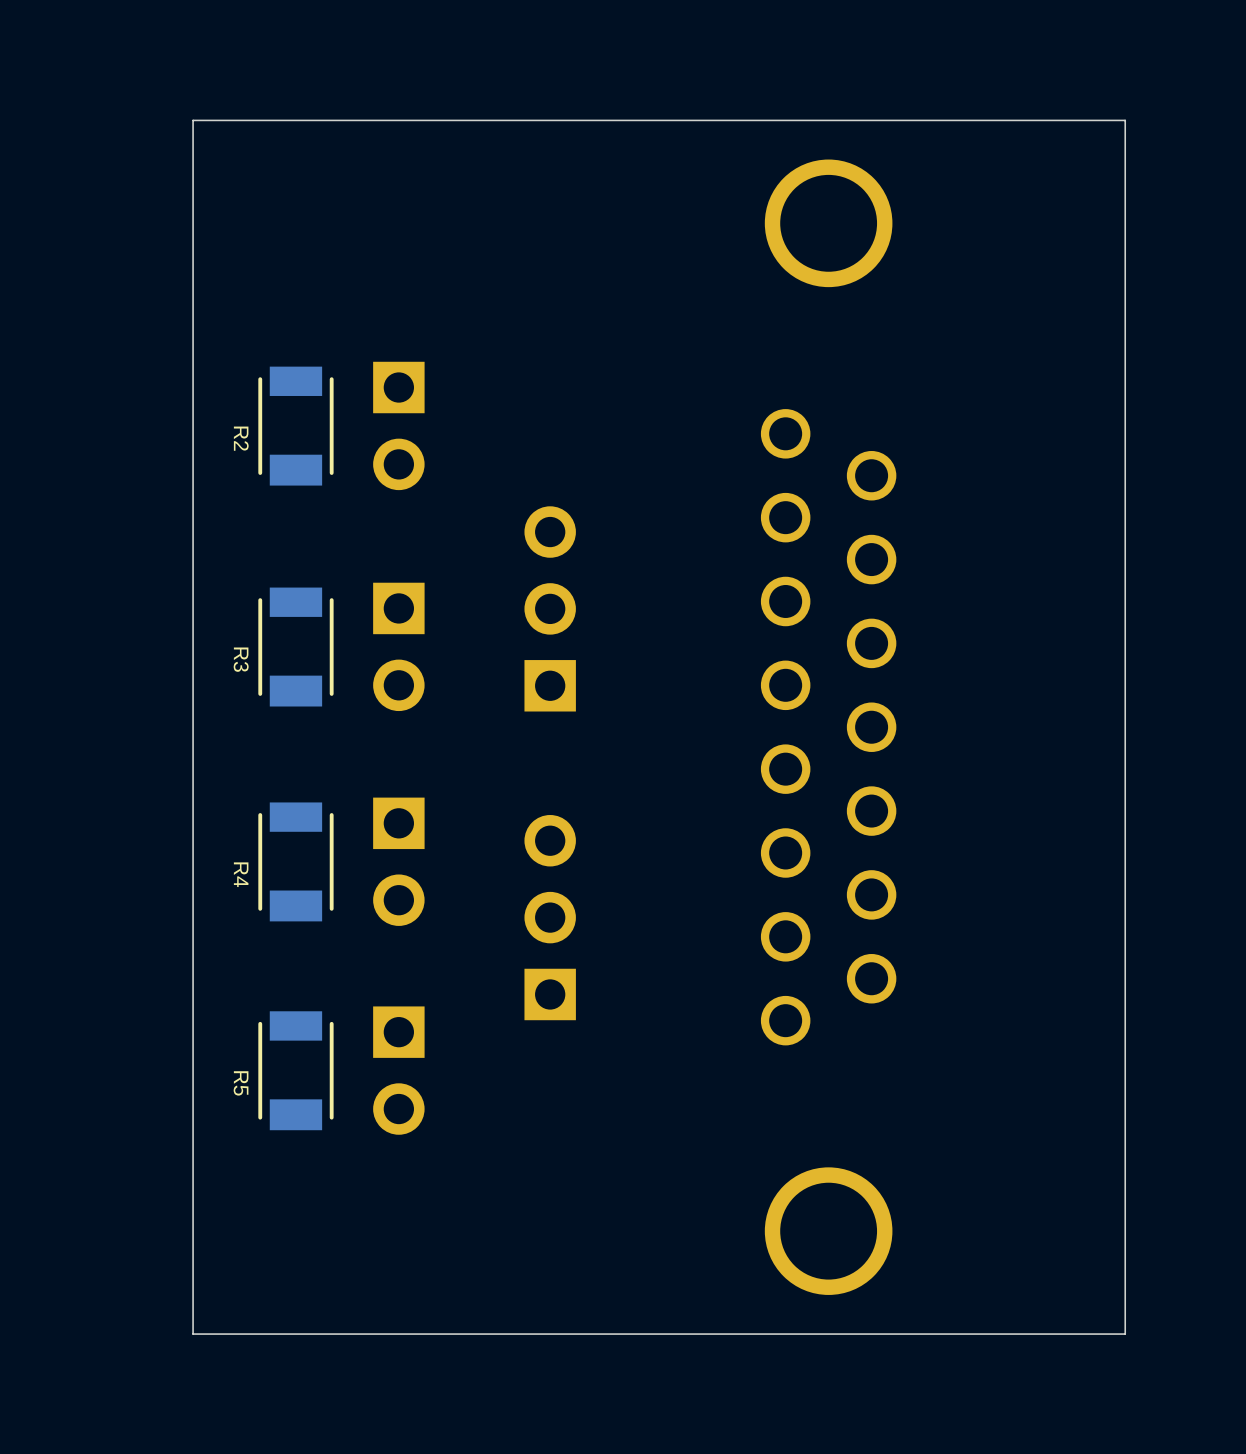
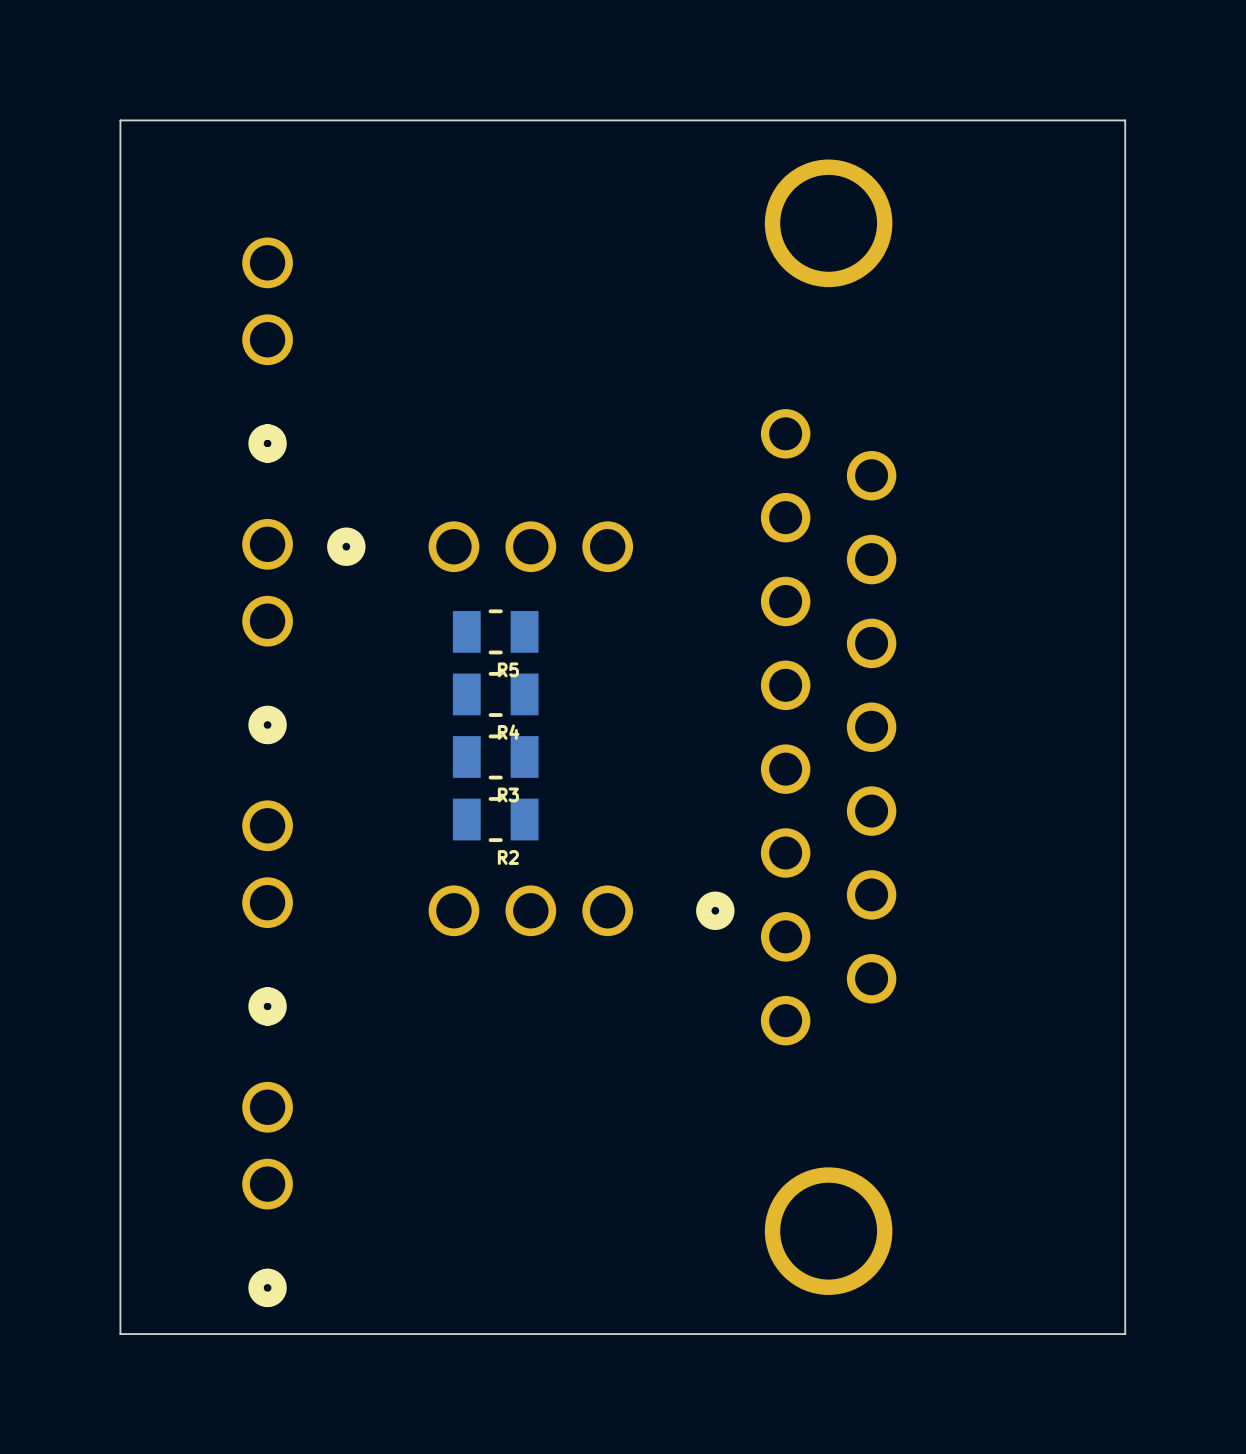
board edge: (193, 120) (193, 1334) -> (193, 120) (120, 120) (120, 1334) (193, 1334)
part: none -> (267, 350)
R2 footprint: [258, 366, 334, 486] -> [452, 797, 539, 843]
part: (398, 425) -> none
R2 name position: R2 (241, 438) -> R2 (508, 857)
part: none -> (480, 546)
R3 footprint: [258, 587, 334, 707] -> [452, 734, 539, 780]
part: (550, 608) -> none
part: none -> (267, 631)
part: (398, 646) -> none
R3 name position: R3 (241, 659) -> R3 (508, 794)
R4 footprint: [258, 802, 334, 922] -> [452, 671, 539, 717]
part: (398, 861) -> none
R4 name position: R4 (241, 874) -> R4 (508, 732)
part: none -> (581, 910)
part: none -> (267, 913)
part: (550, 917) -> none
R5 footprint: [258, 1011, 334, 1131] -> [452, 609, 539, 655]
part: (398, 1070) -> none
R5 name position: R5 (241, 1083) -> R5 (508, 669)
part: none -> (267, 1194)

